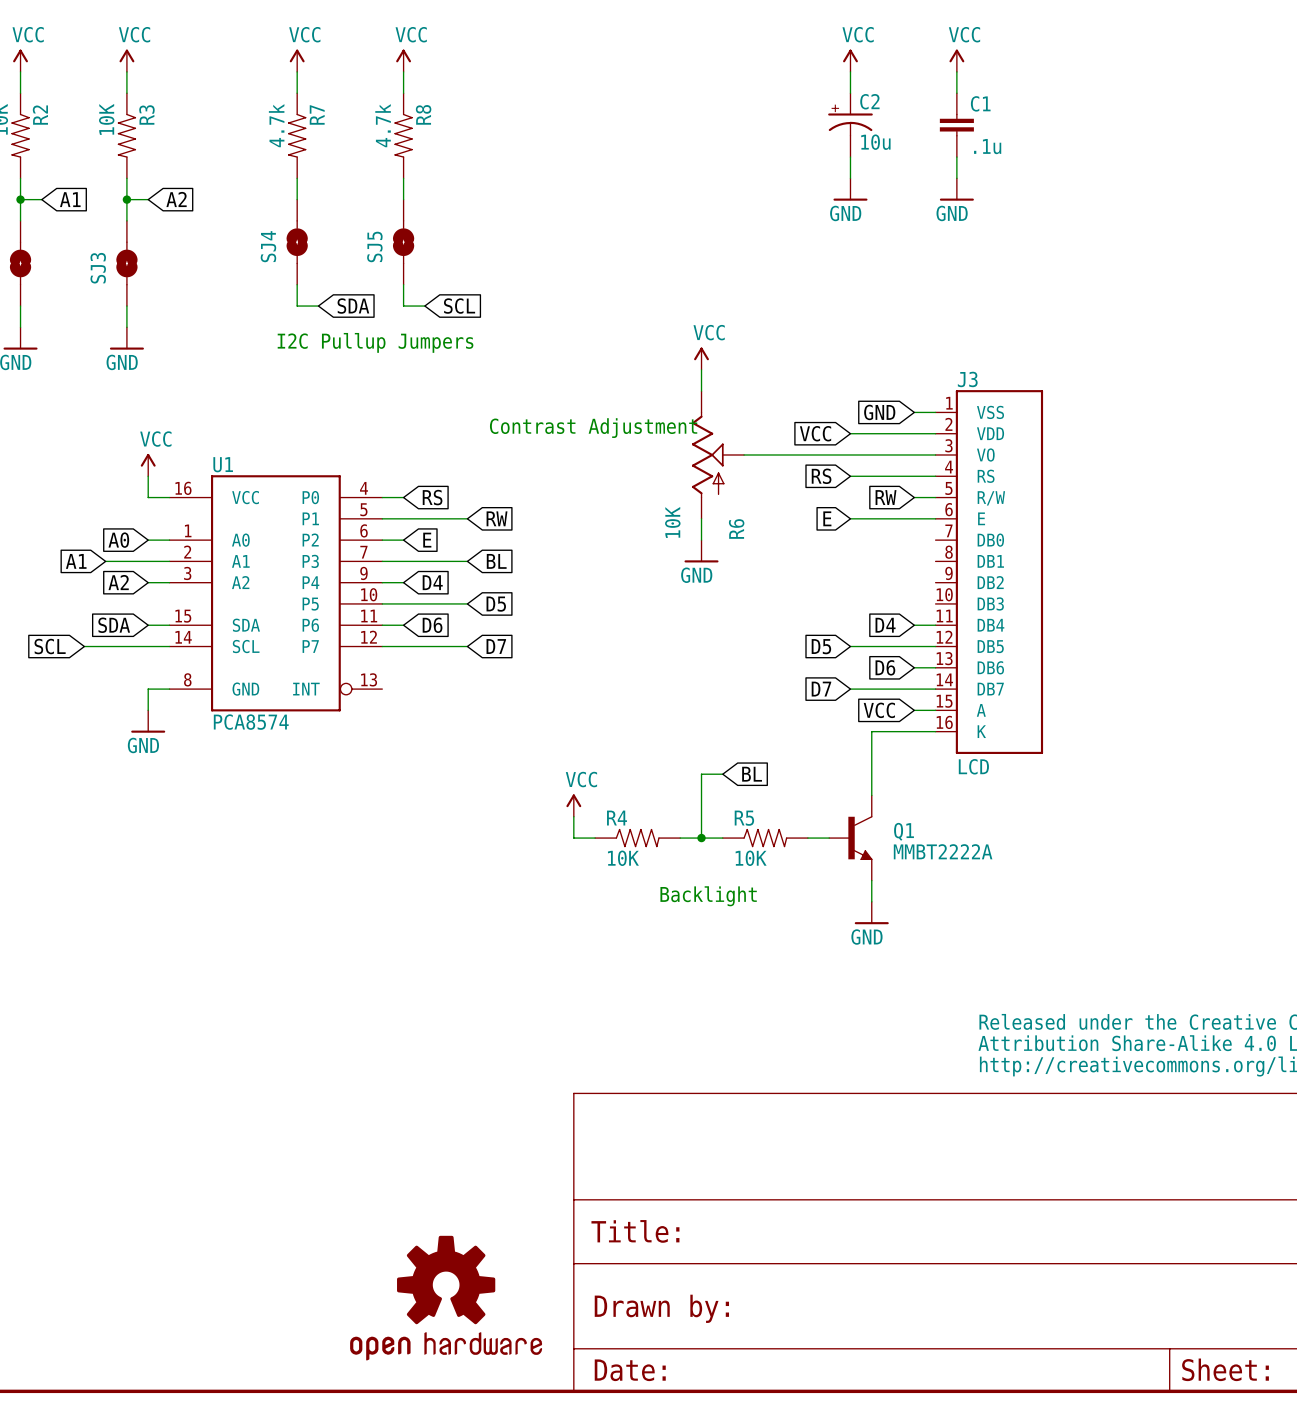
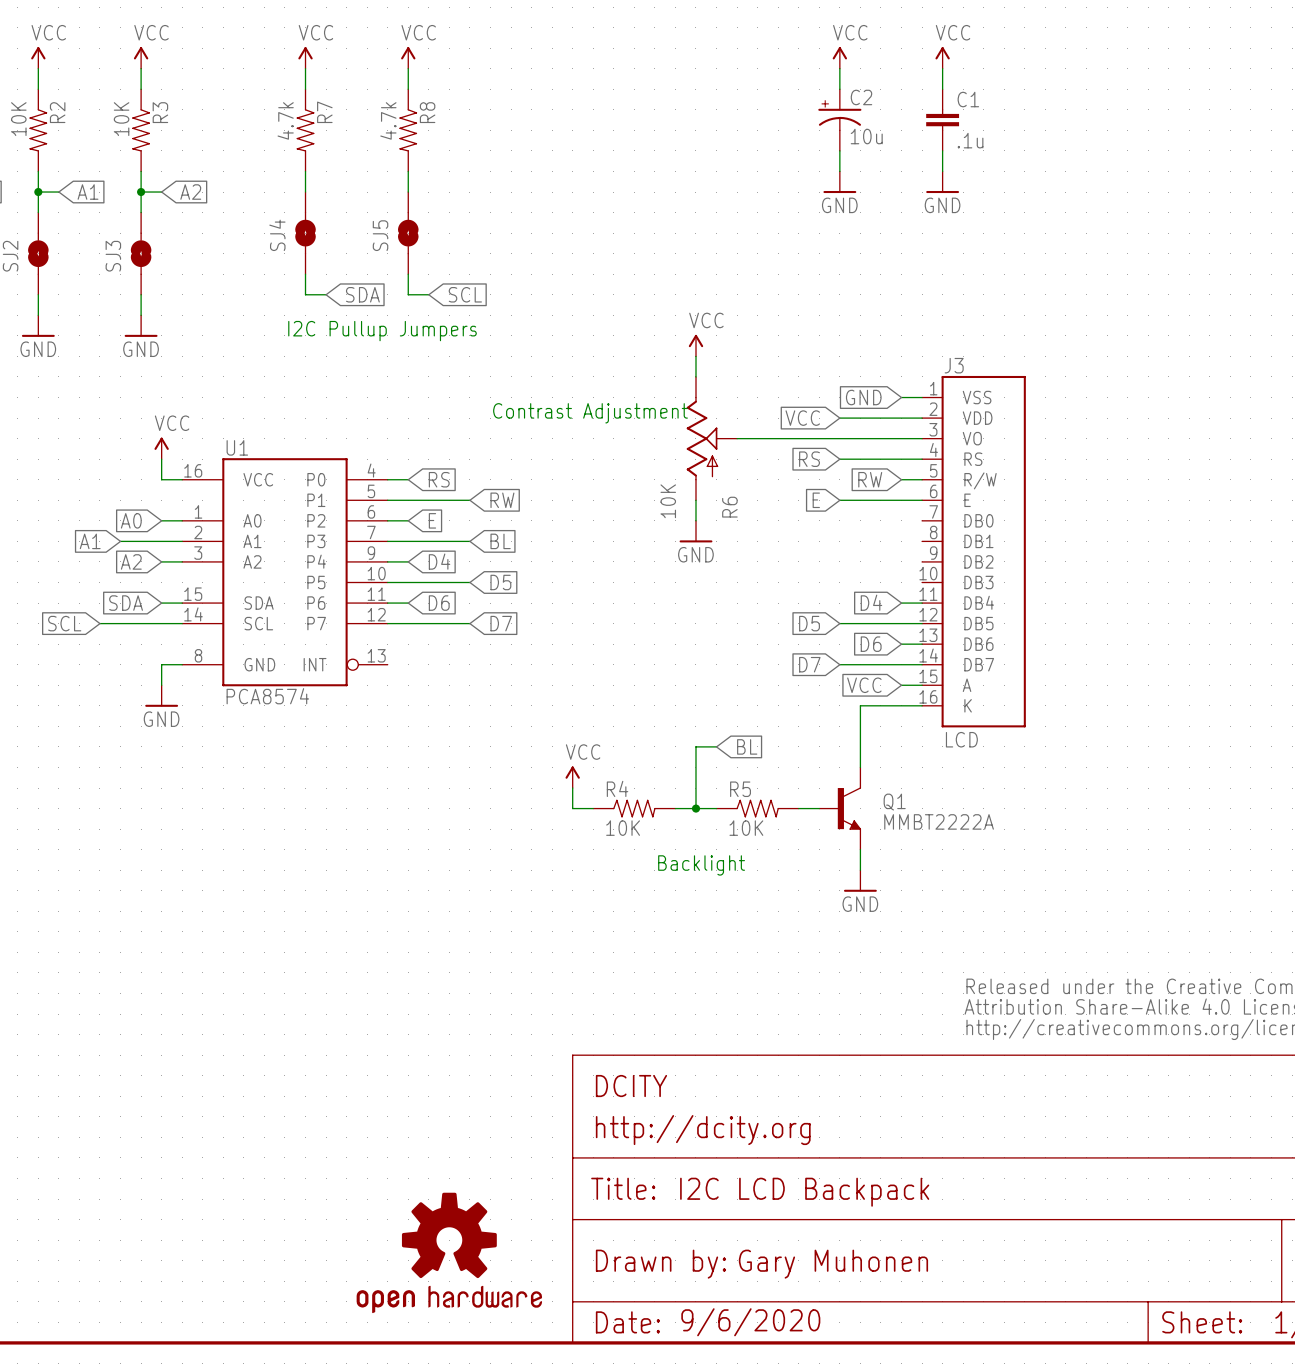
part text: none -> DCITY (631, 1086)
part text: none -> http://dcity.org (703, 1130)
part text: none -> I2C LCD Backpack (804, 1192)
part text: none -> Gary Muhonen (833, 1264)
part text: none -> 9/6/2020 (750, 1322)

